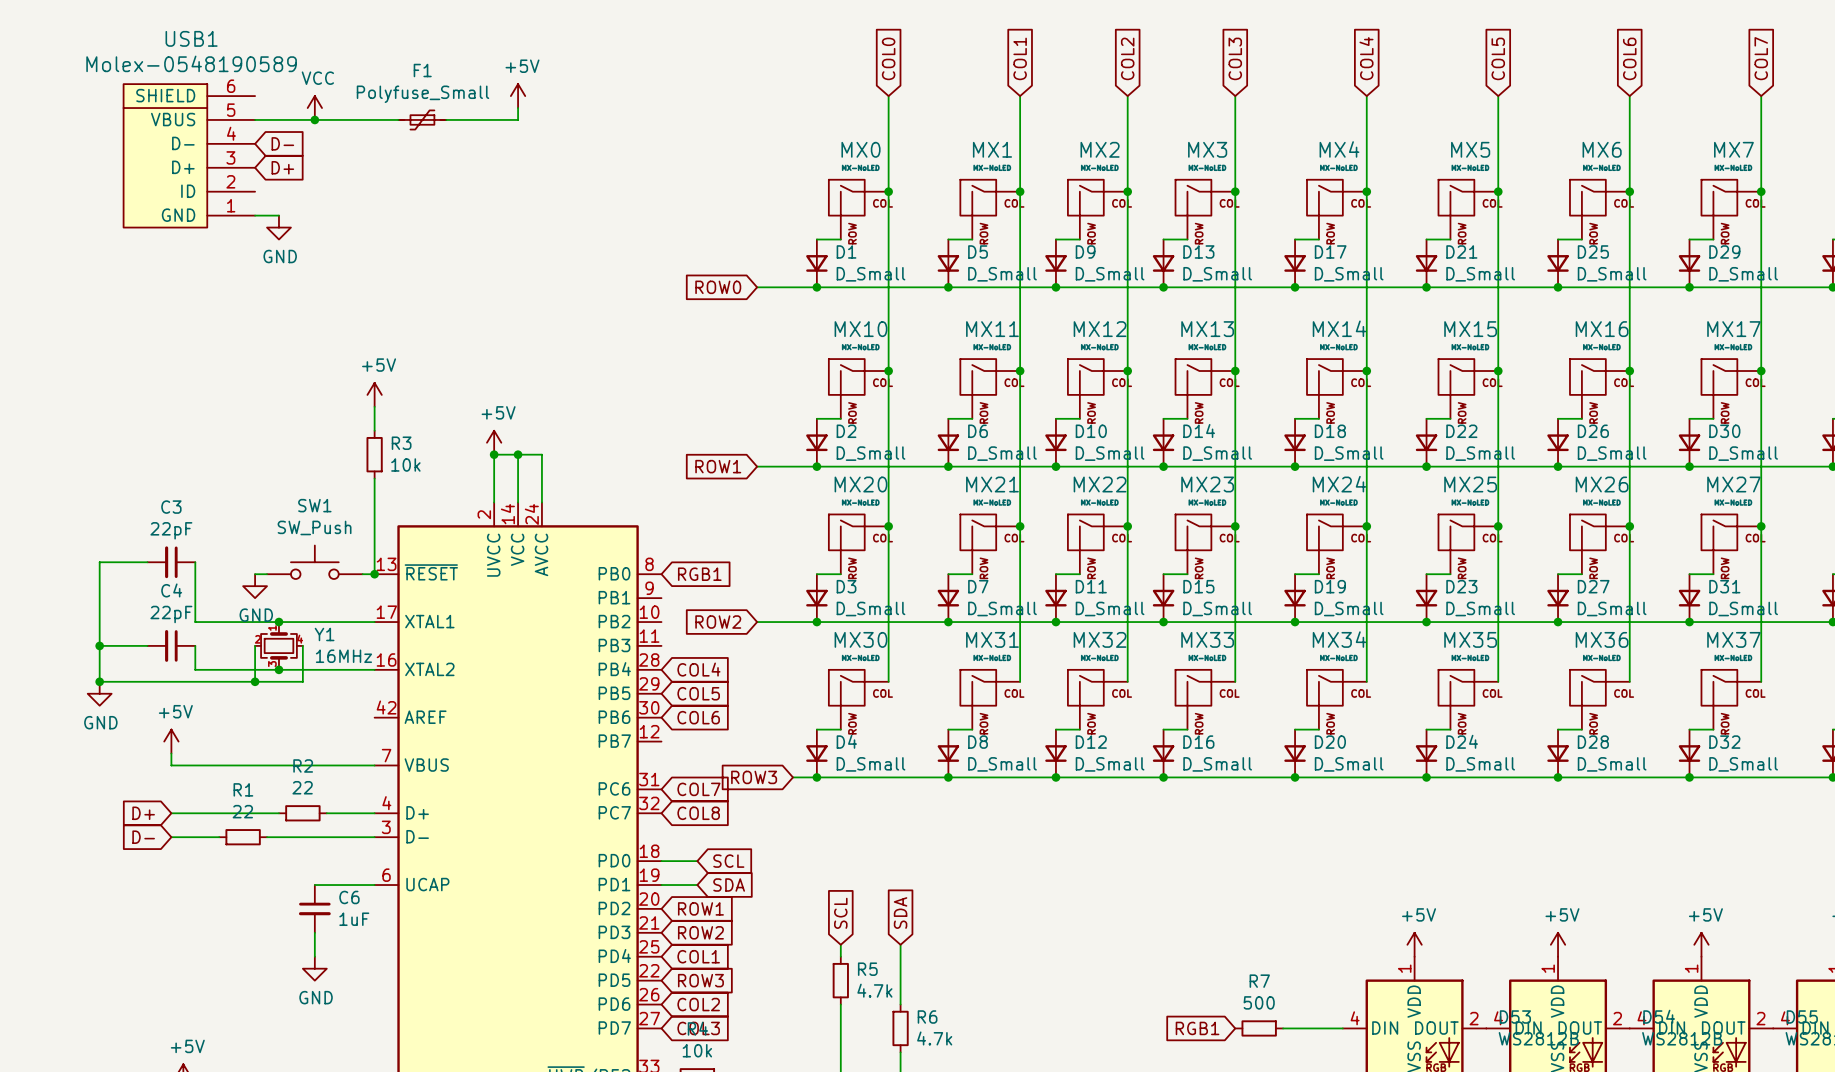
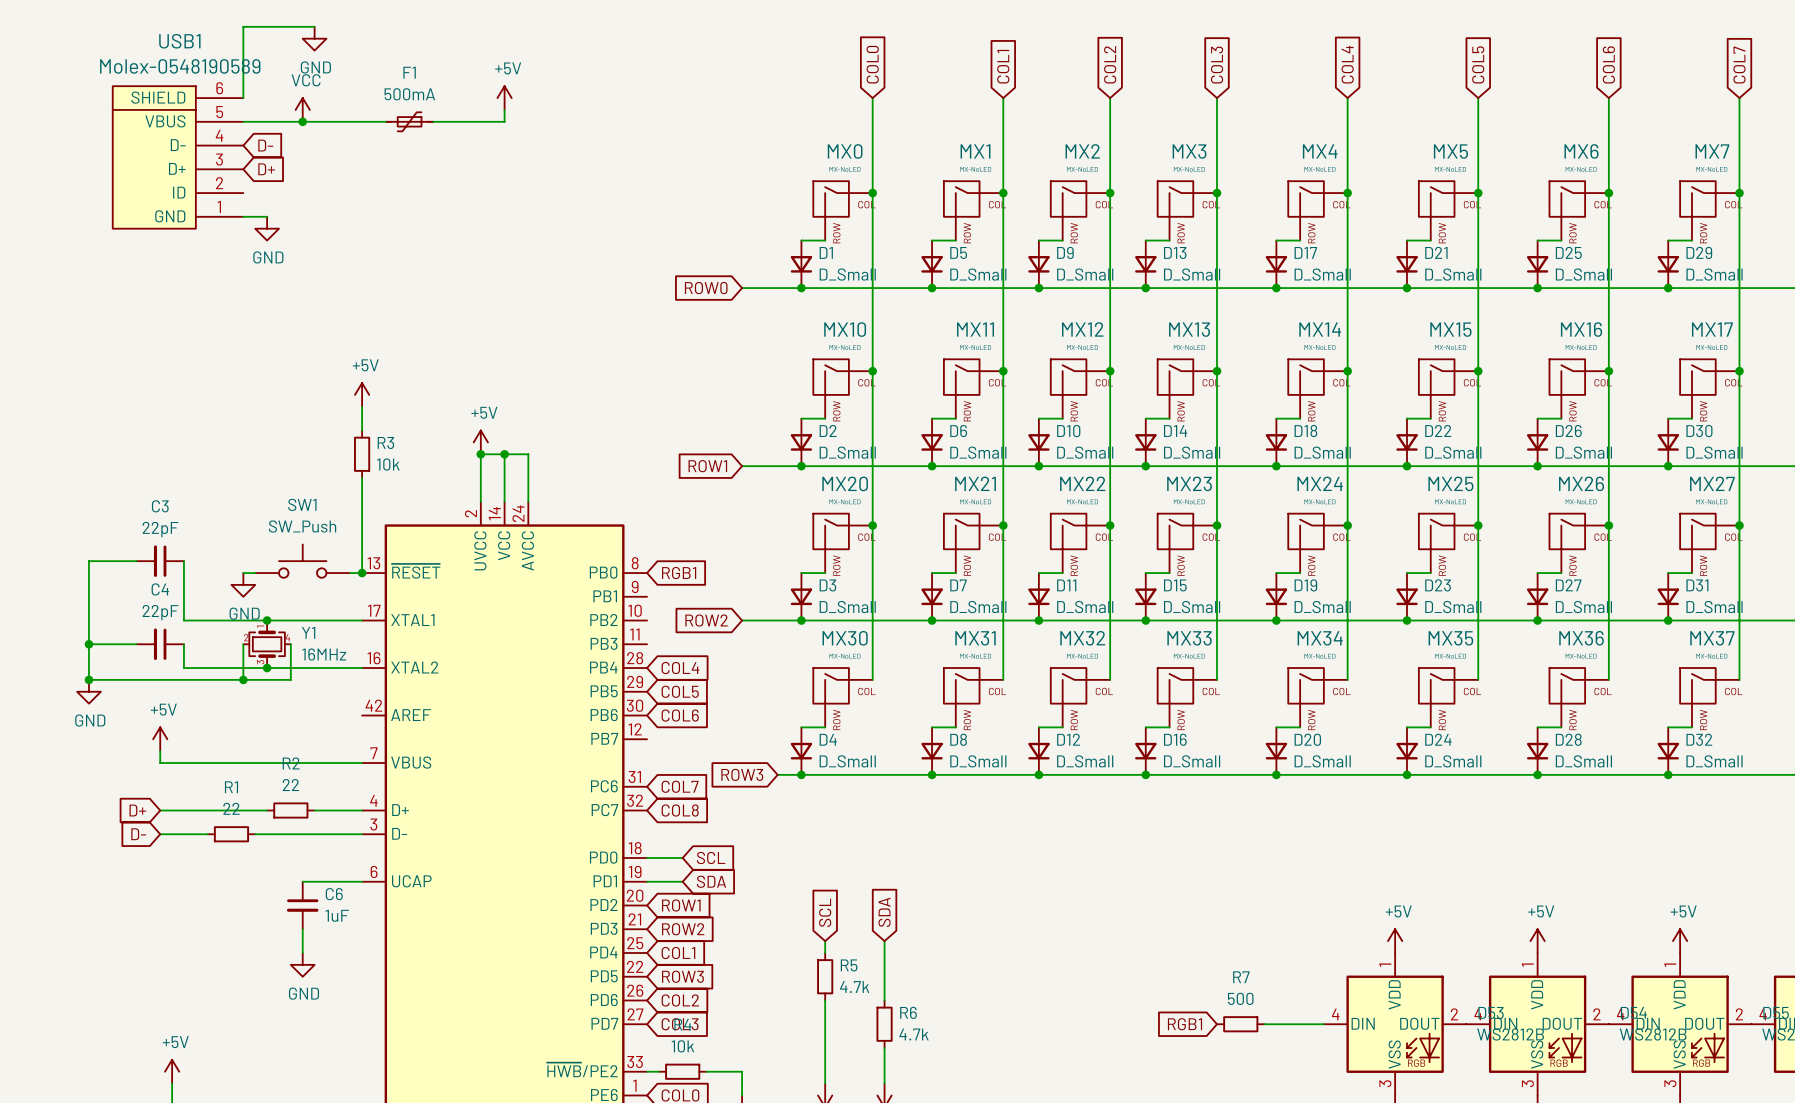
wire: none -> (314, 26) (243, 26) (243, 98)
power symbol: none -> GND (314, 38)
F1 value: Polyfuse_Small (422, 94) -> 500mA (409, 94)

